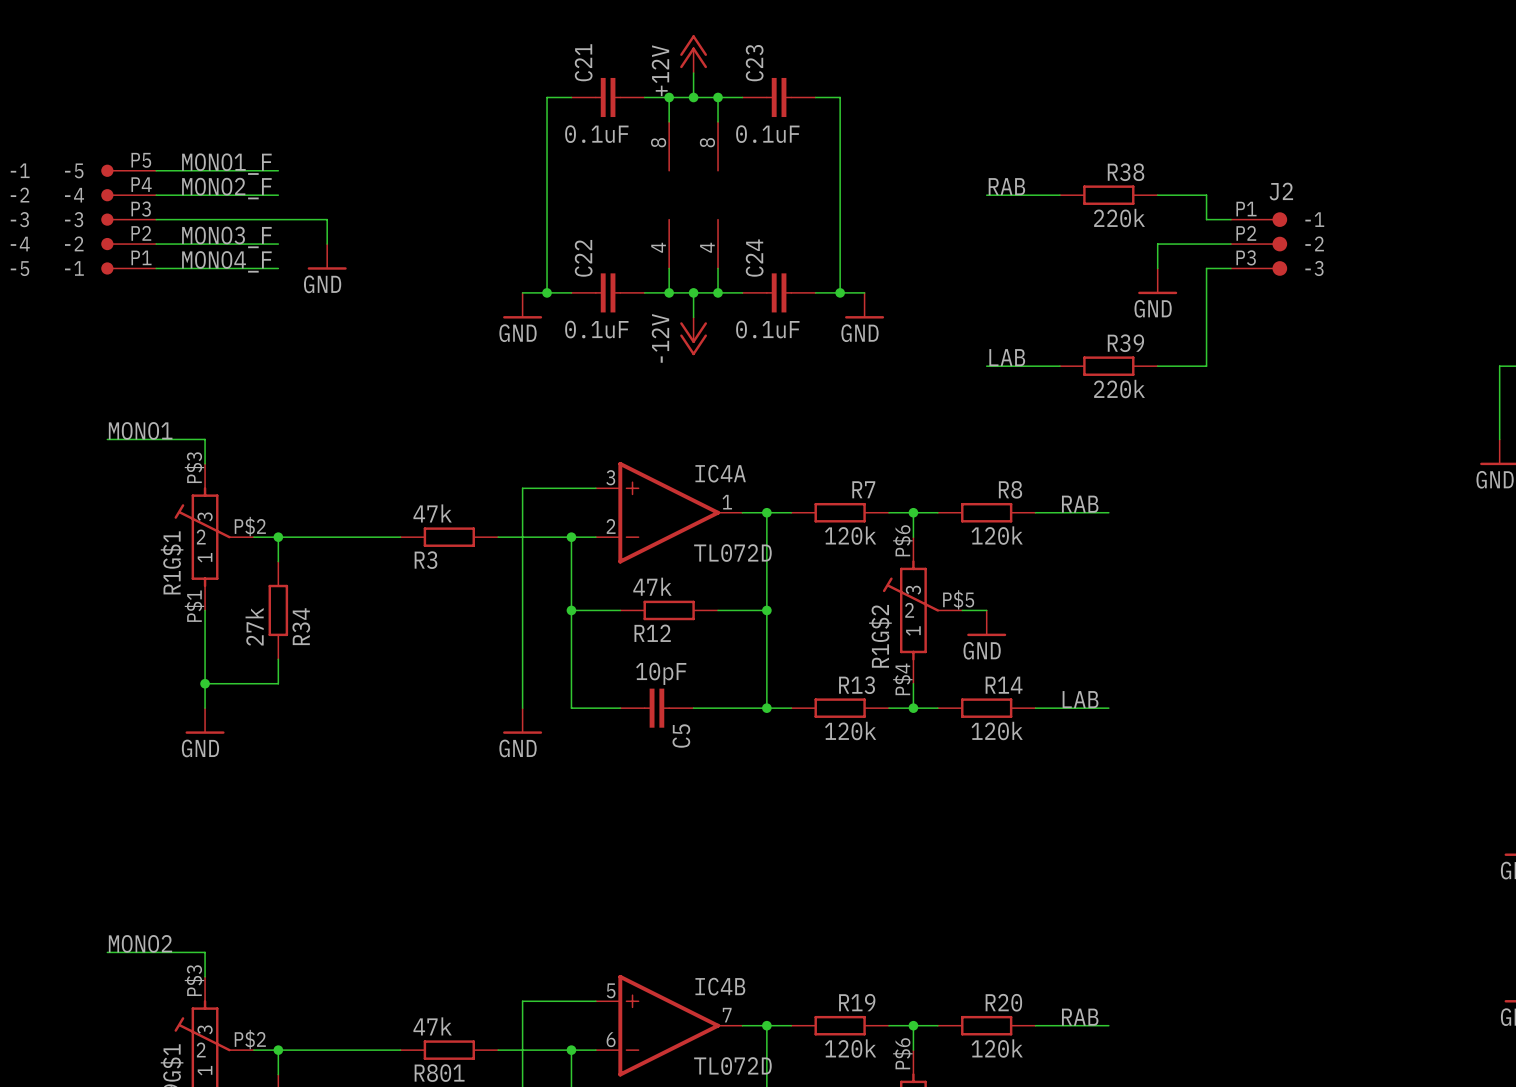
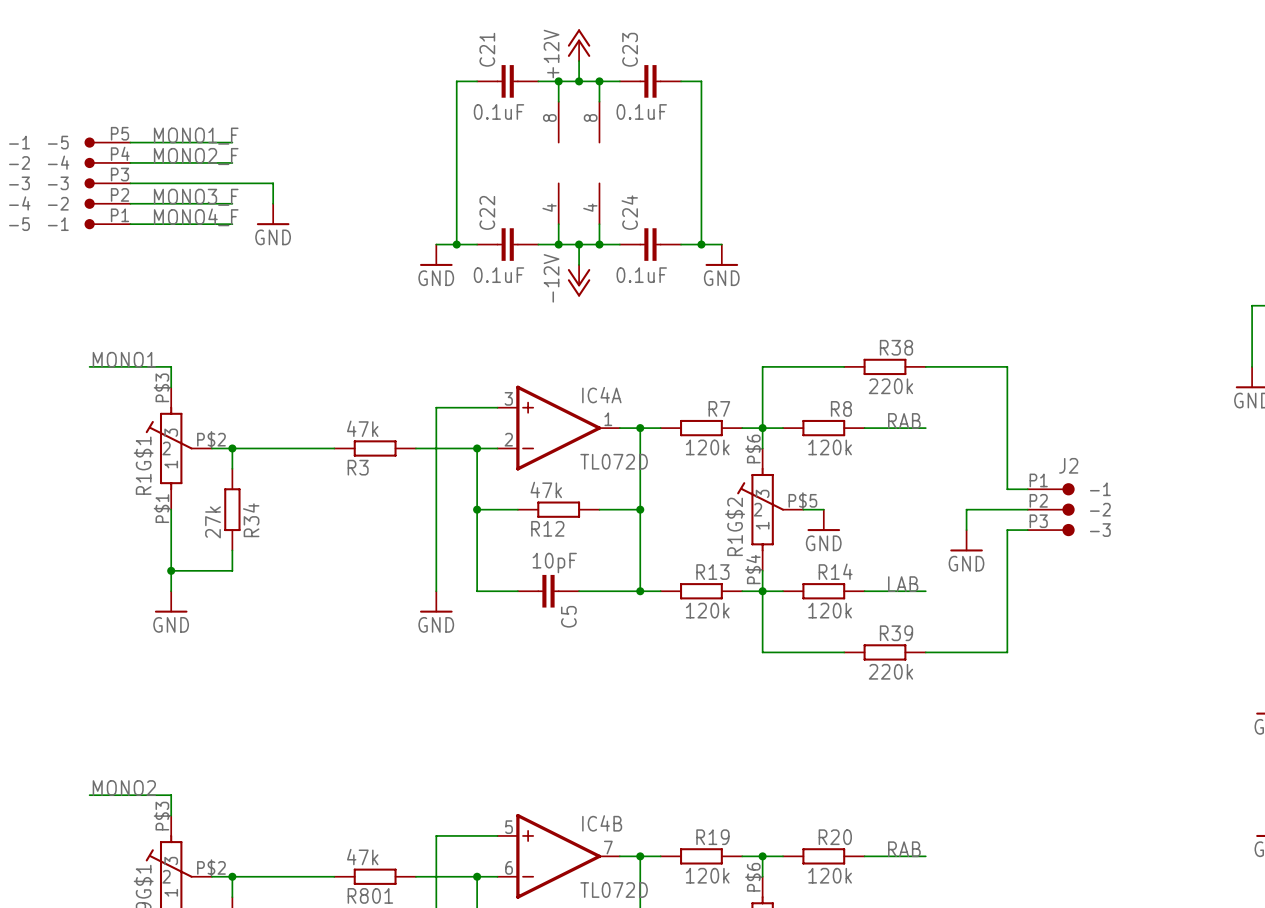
label: RAB (1006, 186) -> none
wire: (986, 195) (1059, 195) -> none
R38 position: (1108, 195) -> (884, 366)
wire: (1157, 195) (1206, 195) (1206, 219) (1230, 219) -> none
wire: (1230, 244) (1157, 244) (1157, 268) -> none
J2 position: (1259, 244) -> (1051, 509)
wire: (1230, 268) (1206, 268) (1206, 366) (1157, 366) -> none
power symbol: GND (1157, 281) -> none
label: LAB (1007, 357) -> none
wire: (986, 366) (1059, 366) -> none
R39 position: (1108, 366) -> (884, 652)
wire: none -> (844, 366) (762, 366) (762, 428)
wire: none -> (925, 366) (1007, 366) (1007, 489) (1027, 489)
wire: none -> (1027, 509) (966, 509) (966, 530)
wire: none -> (1027, 530) (1007, 530) (1007, 652) (925, 652)
power symbol: none -> GND (966, 540)
wire: none -> (762, 591) (762, 652) (844, 652)

